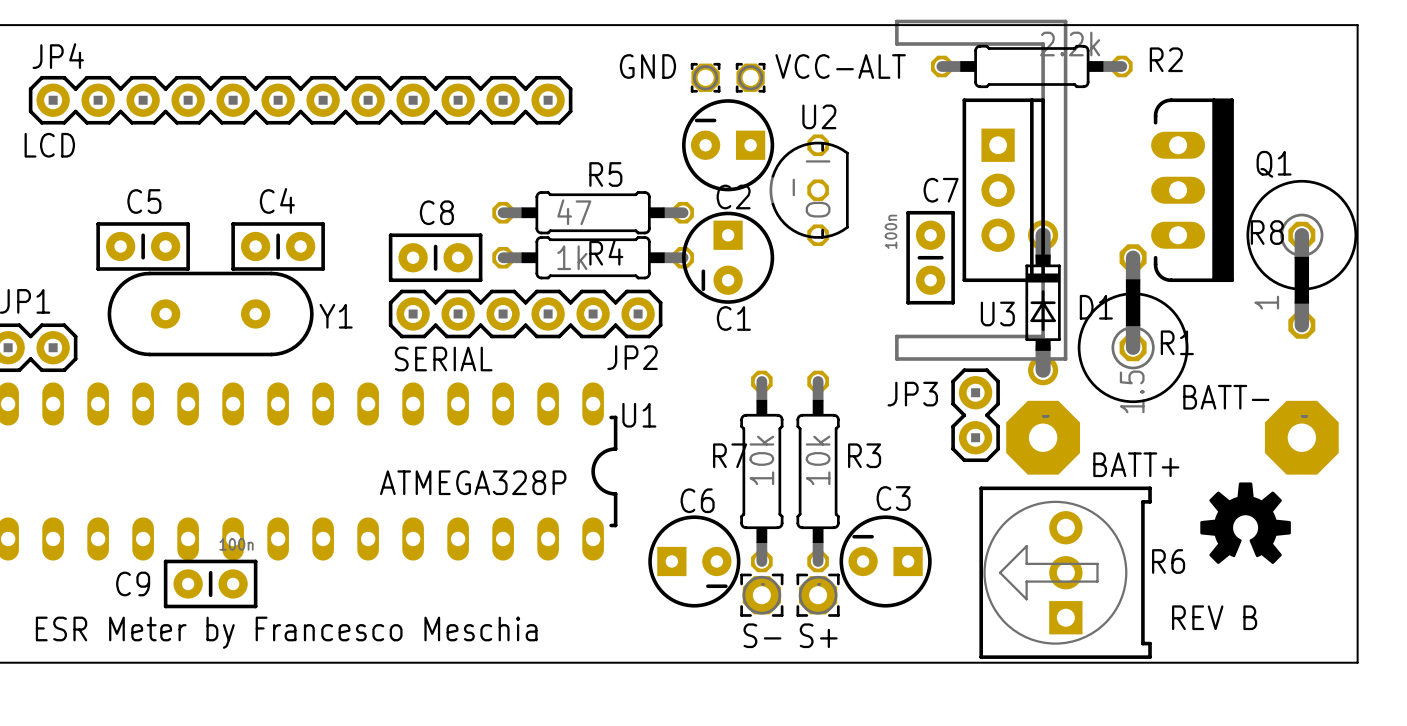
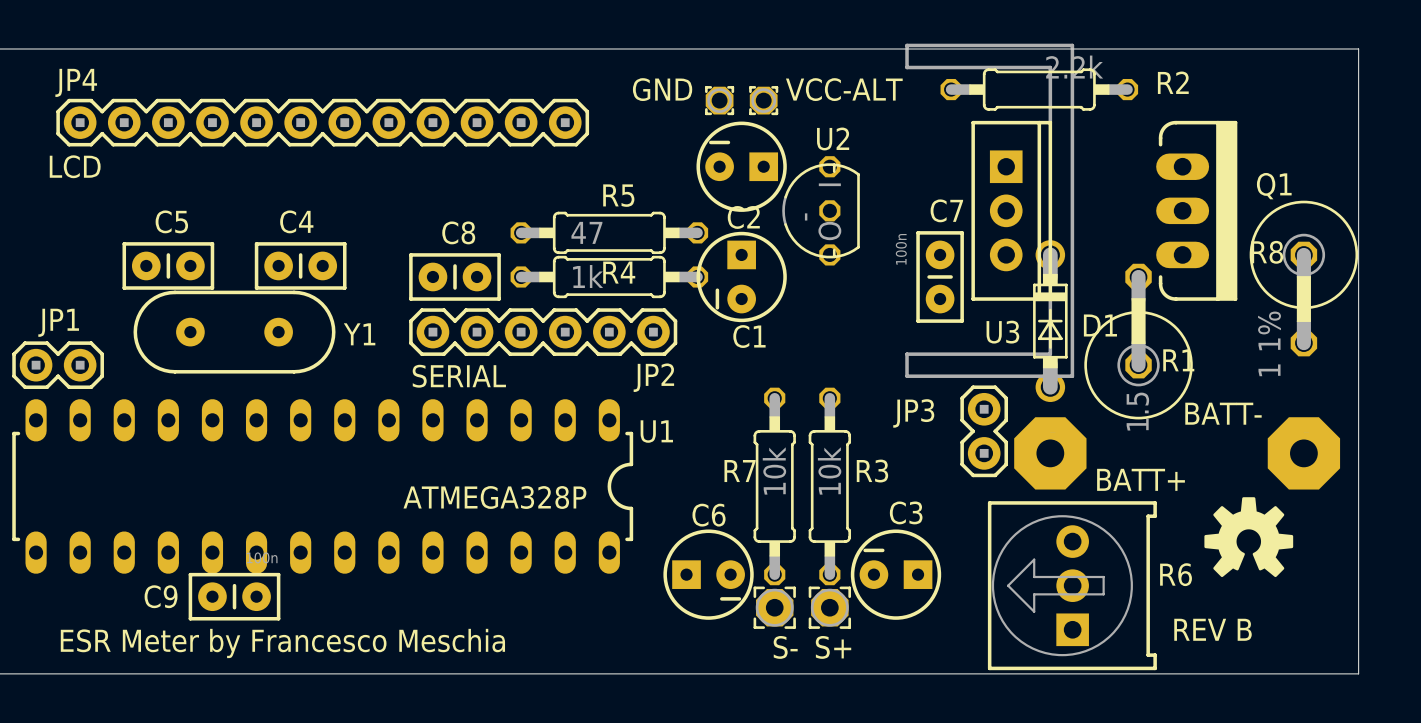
R8 value: 1 (1266, 302) -> 1 1% (1269, 343)

